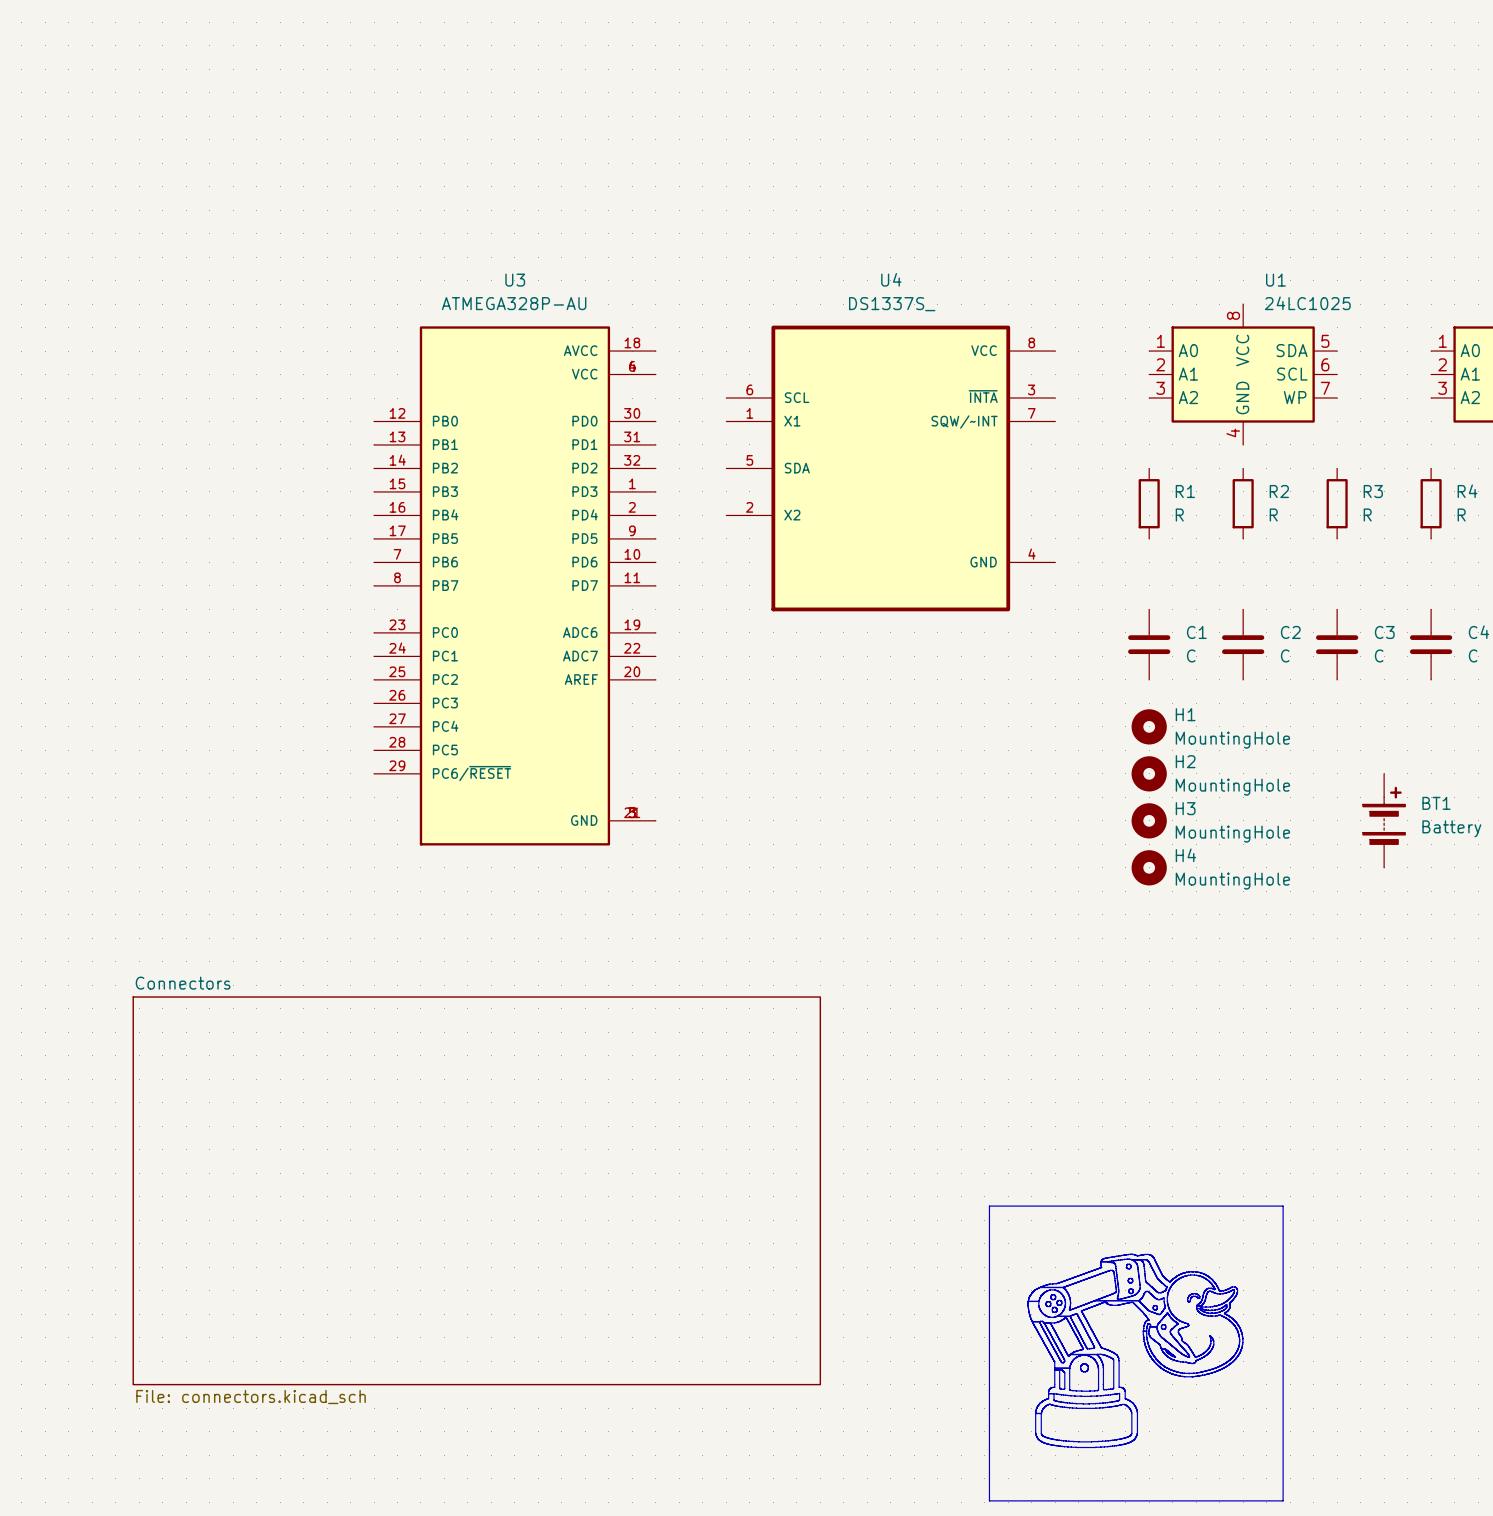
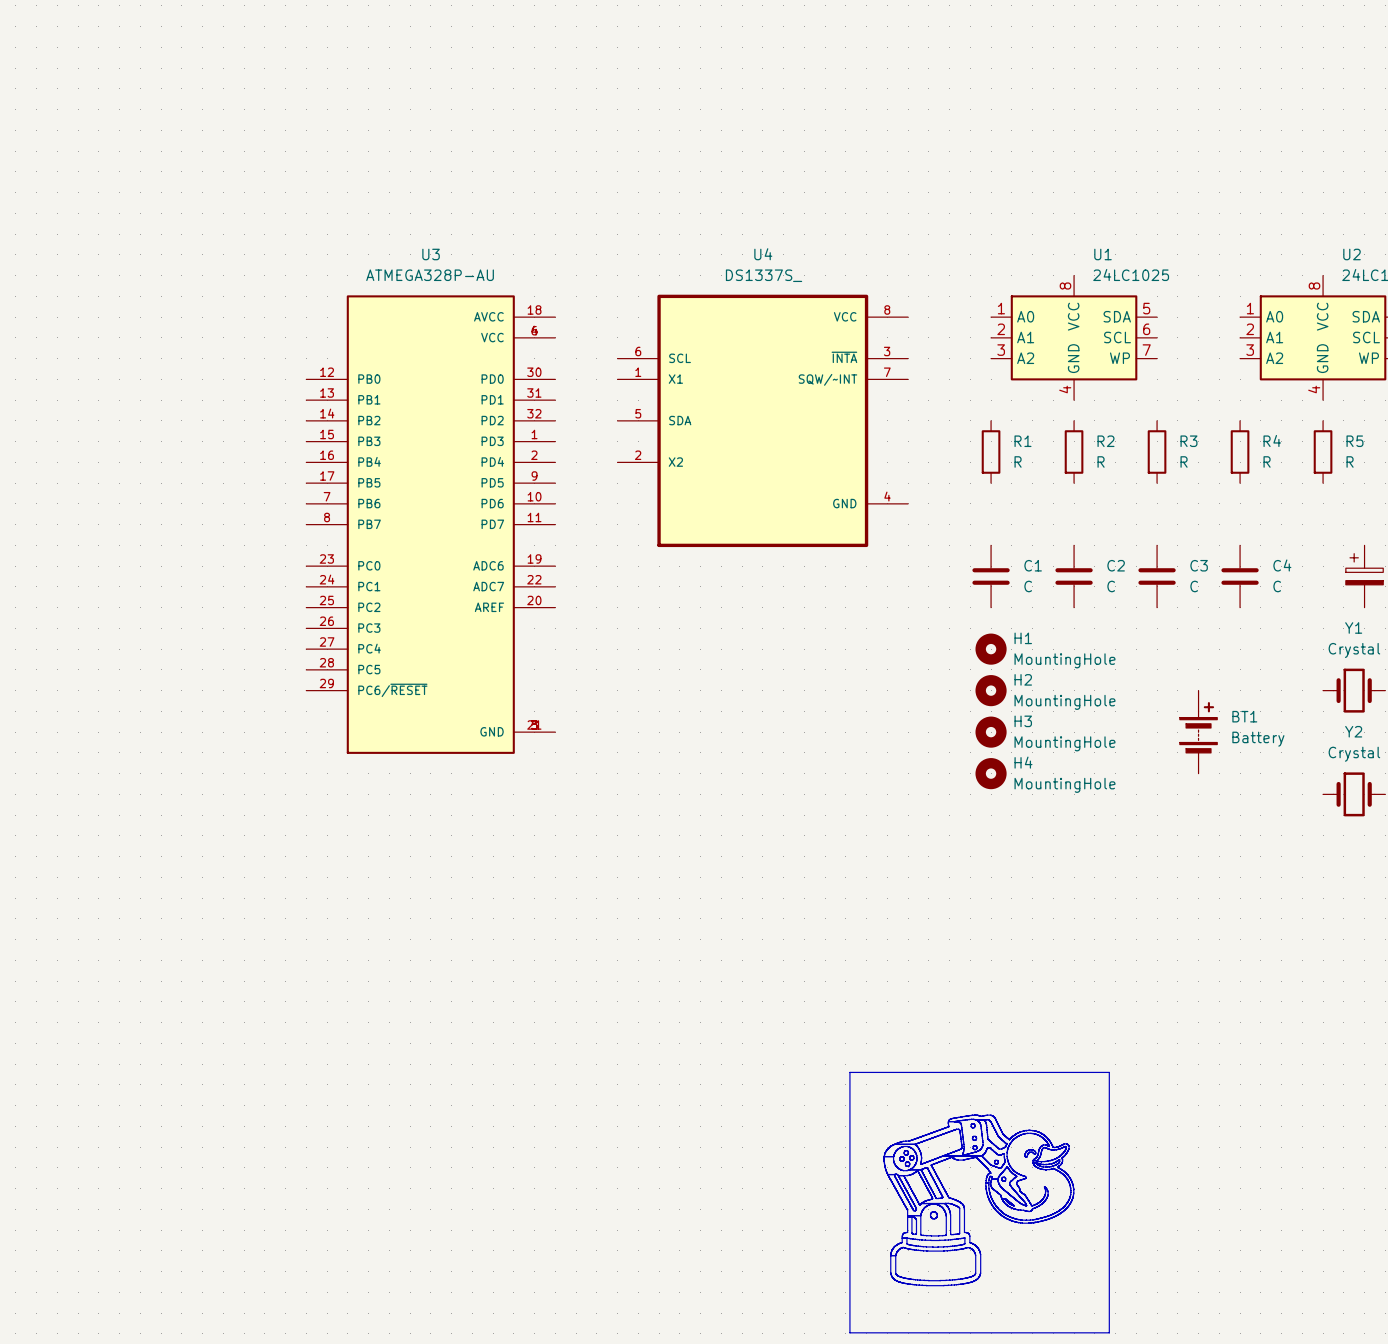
sheet Connectors: File: connectors.kicad_sch (476, 1190) -> none

